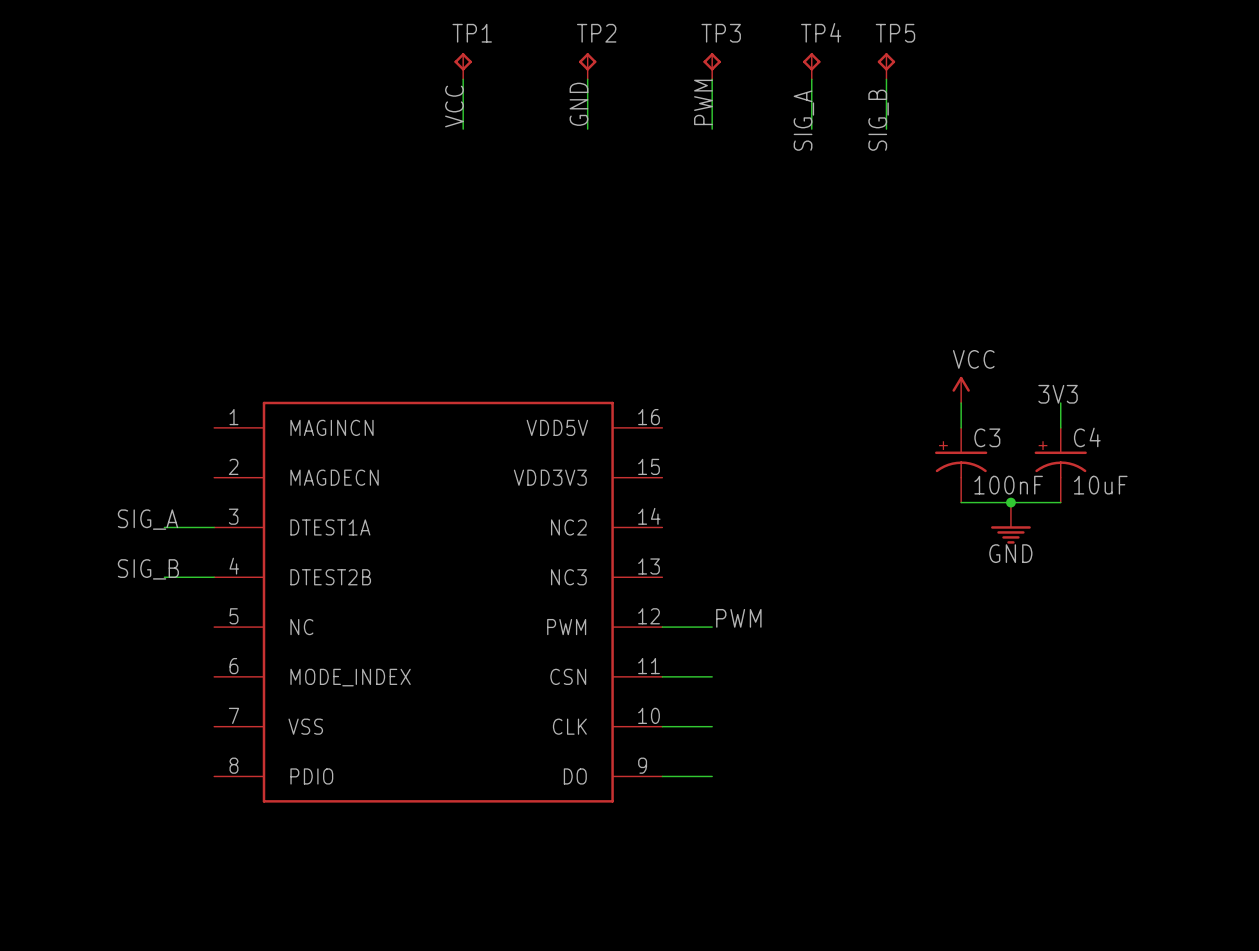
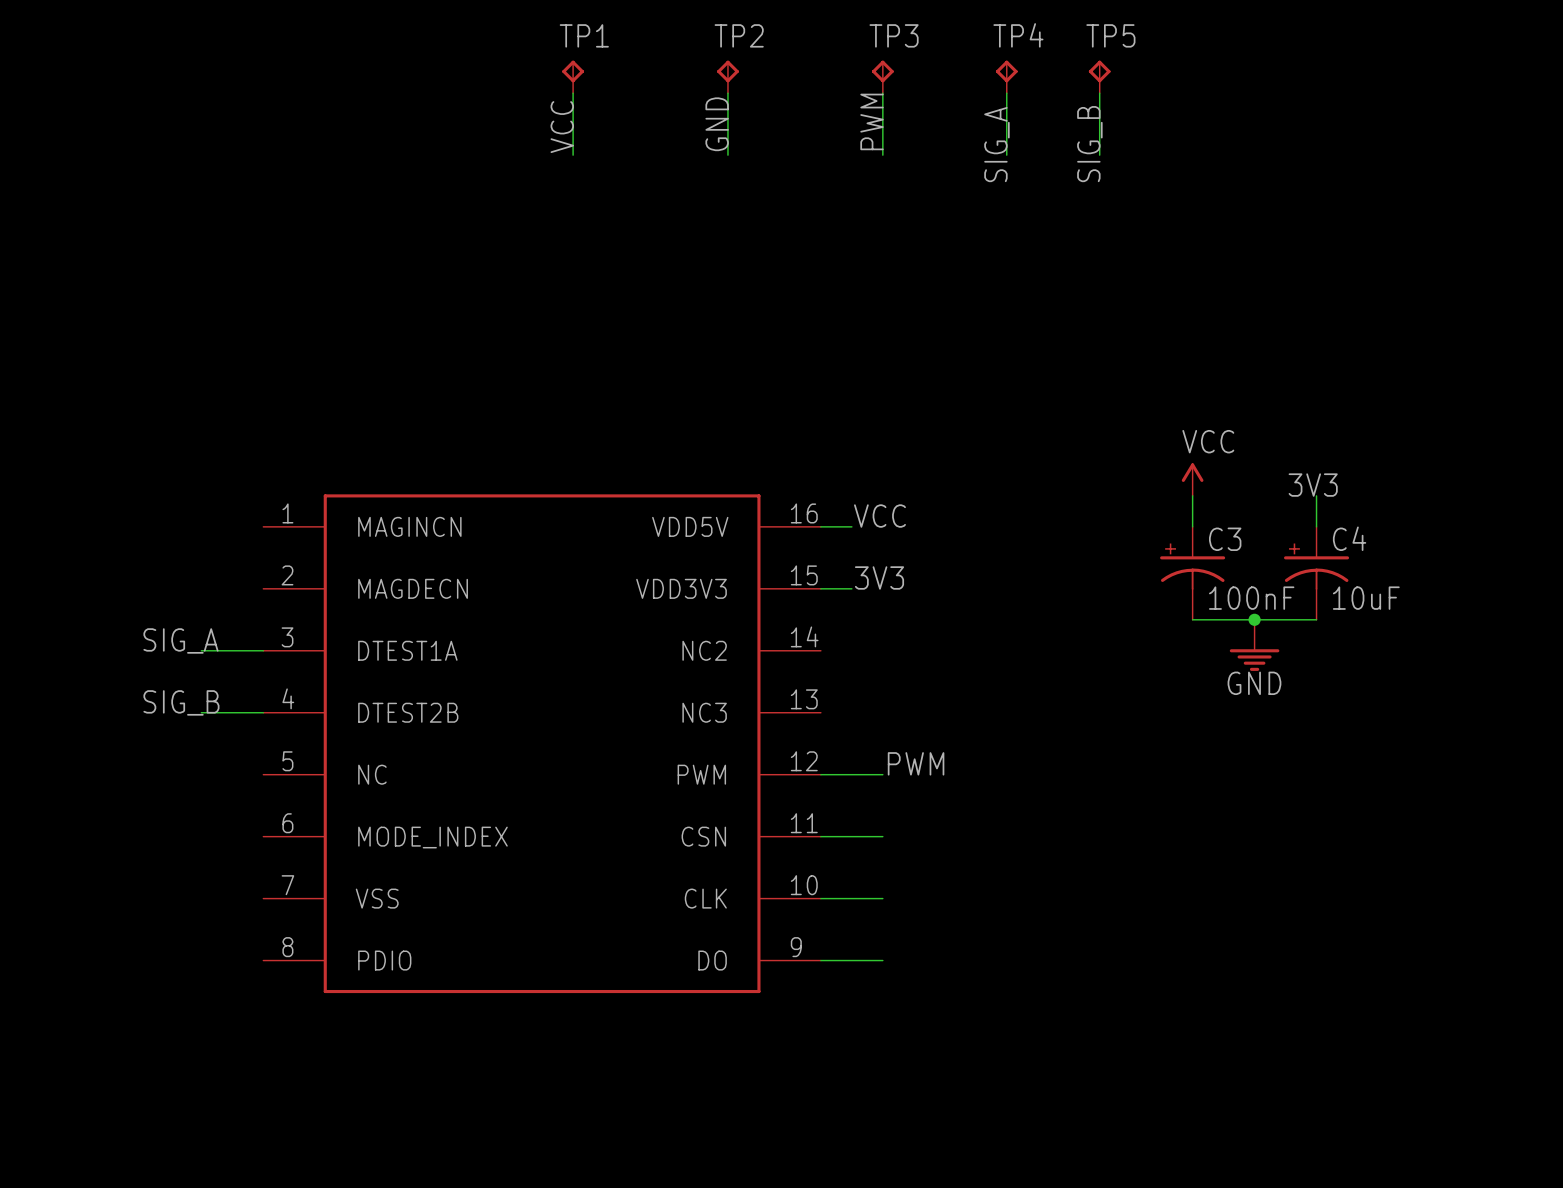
label: none -> VCC (879, 516)
wire: none -> (820, 526) (851, 526)
label: none -> 3V3 (879, 577)
wire: none -> (820, 588) (851, 588)

